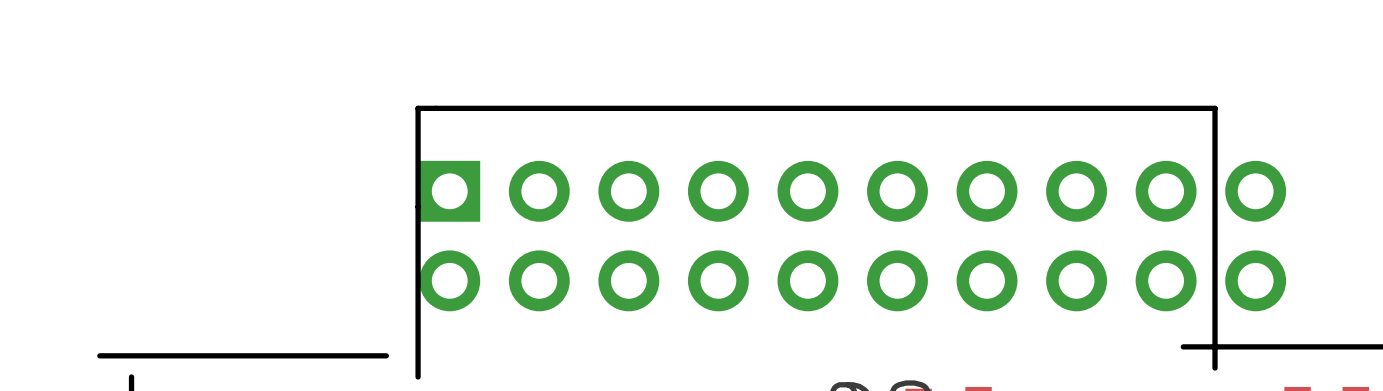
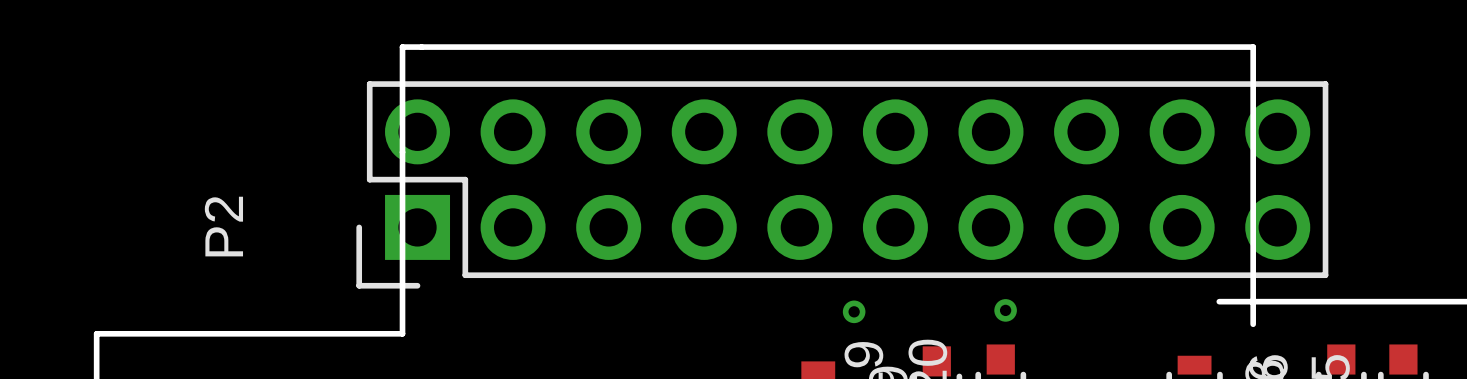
P2 side: bottom (852, 236) -> top (842, 184)
board edge: (99, 355) (386, 355) -> (96, 333) (402, 333)
via: none -> (1005, 310)
via: none -> (854, 311)

